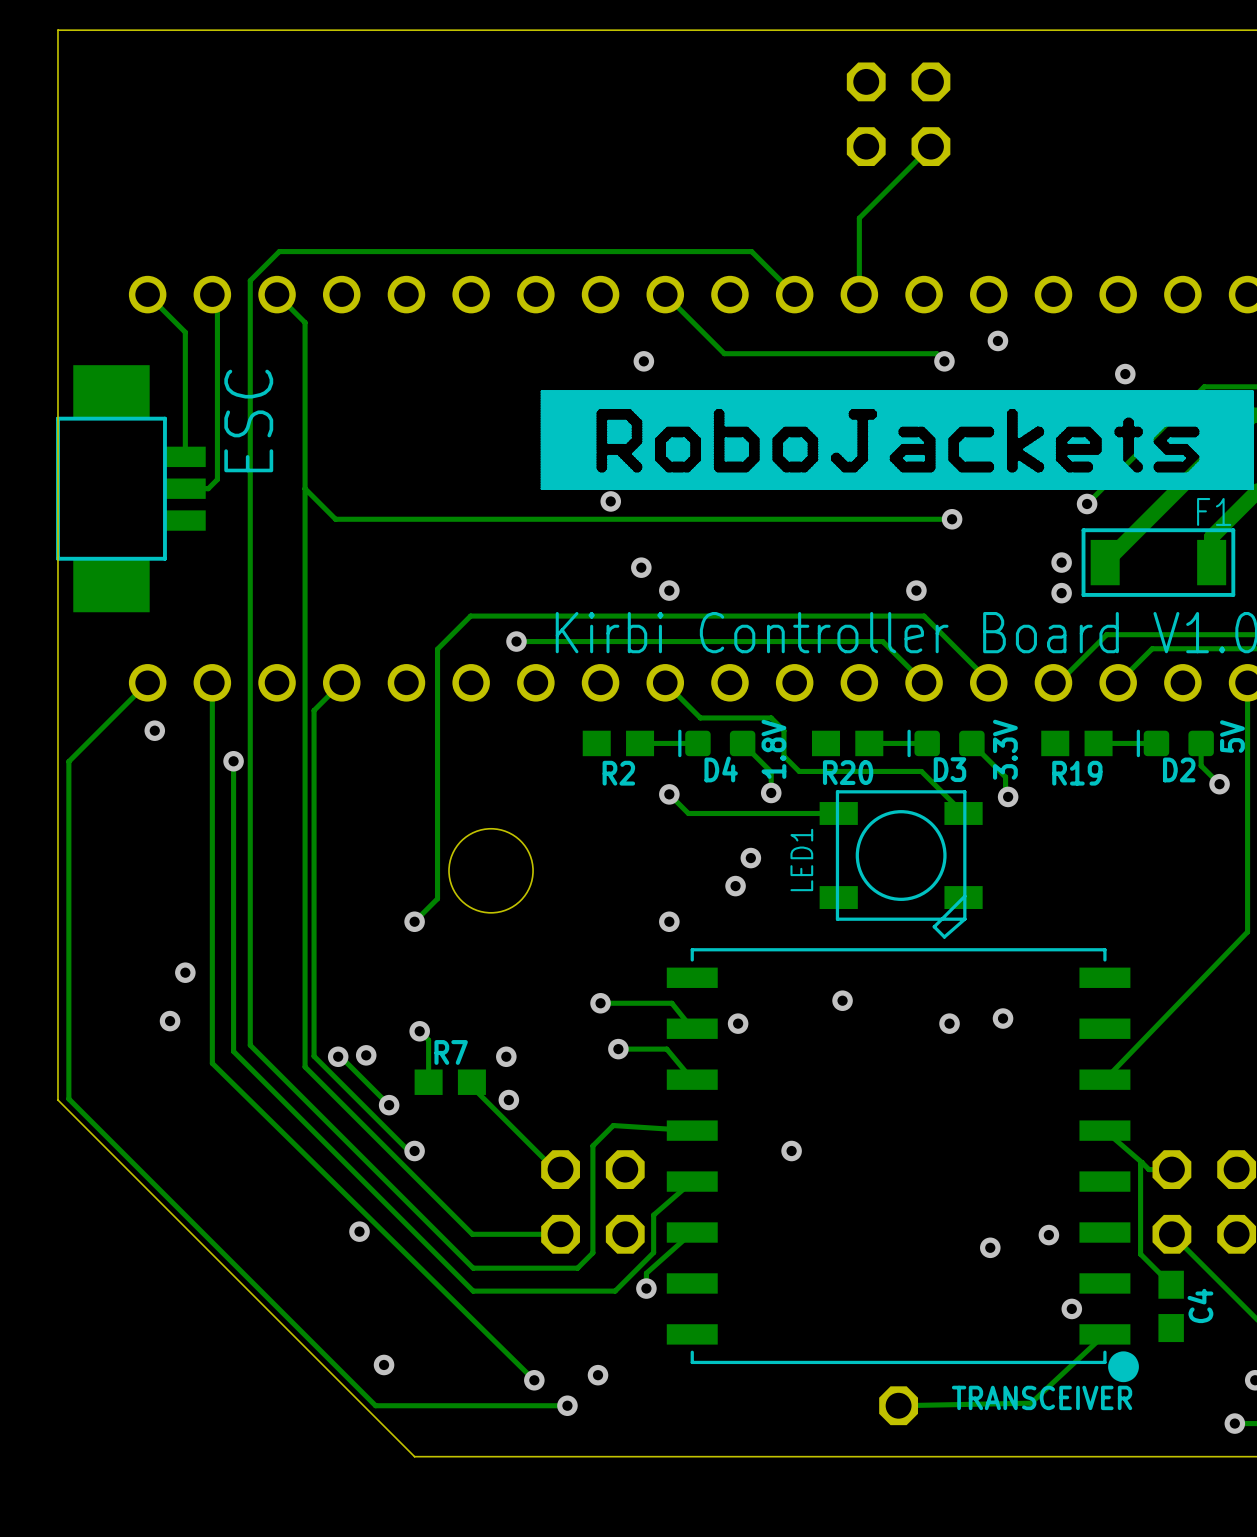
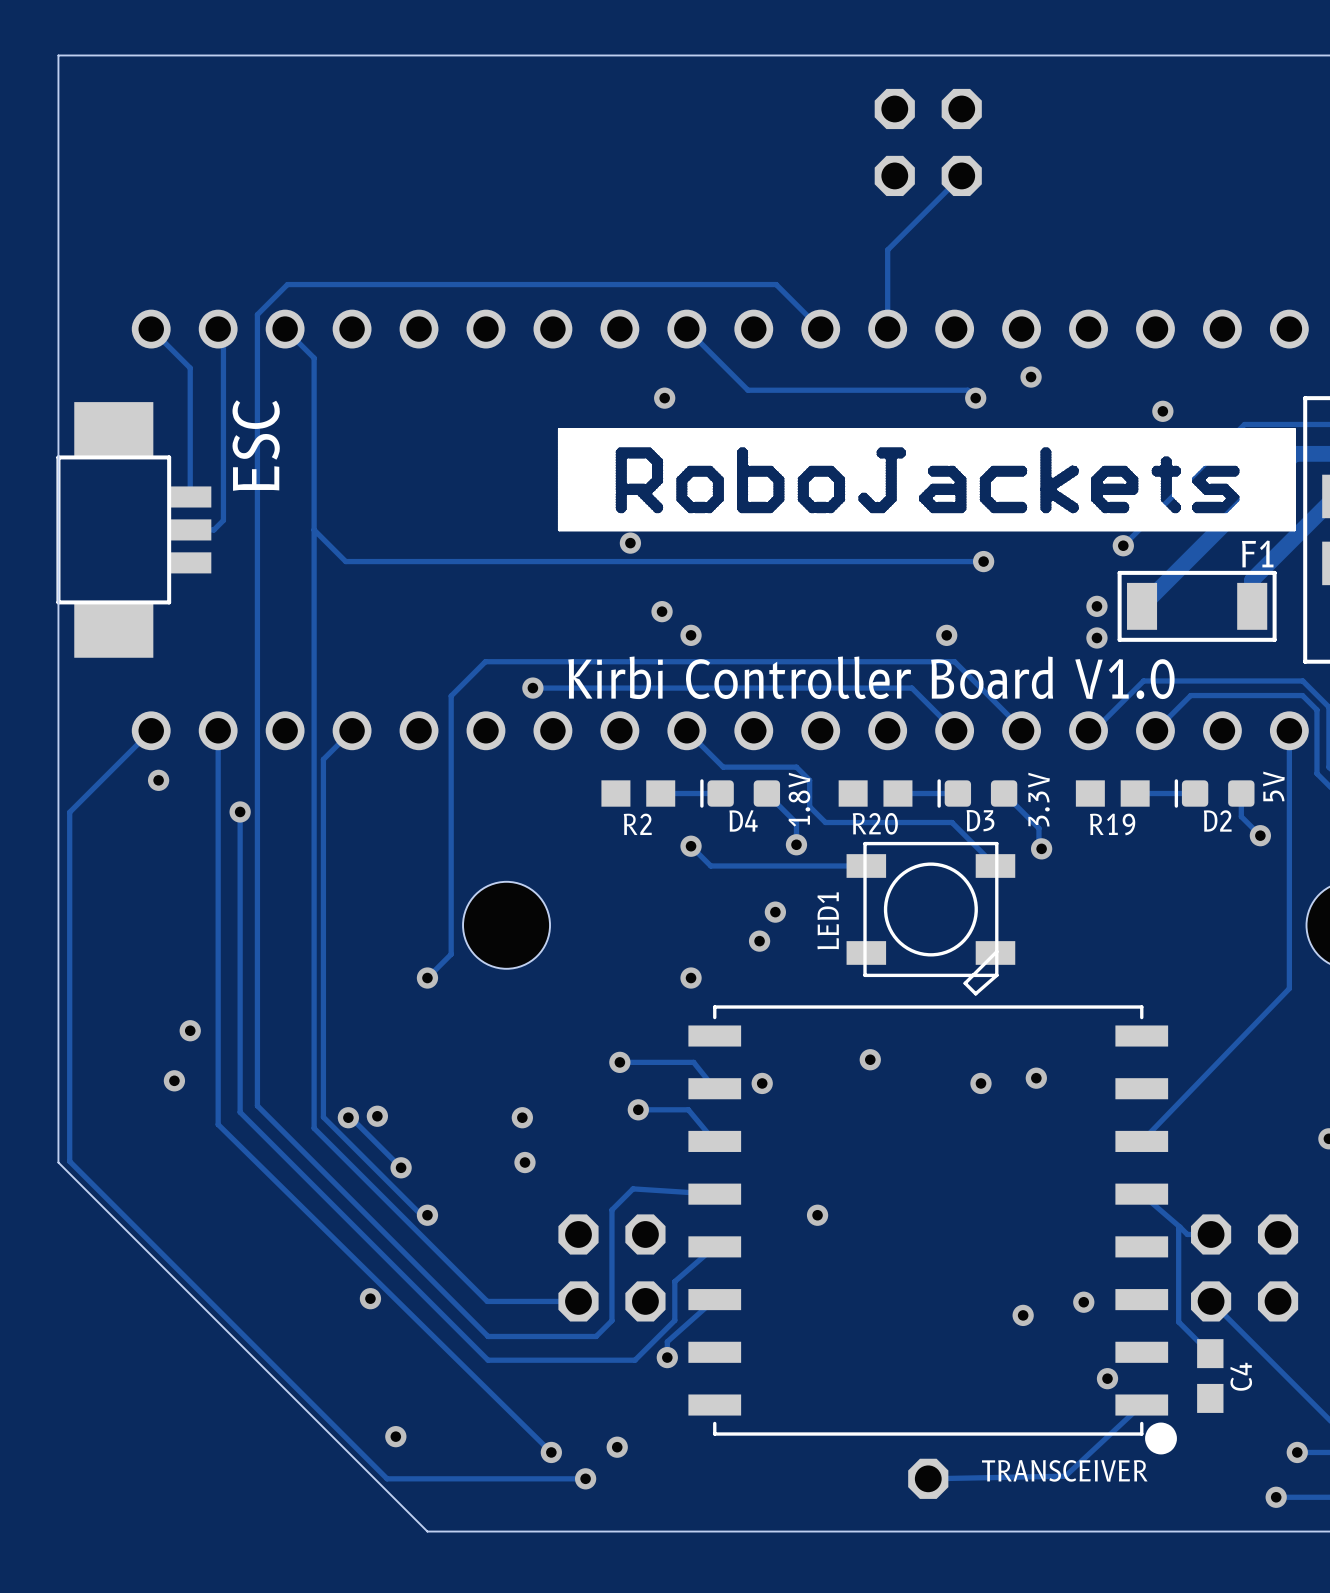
track: (419, 1031) (428, 1040) (428, 1082) -> none
via: (419, 1031) -> none
R7: (450, 1082) -> none
track: (471, 1082) (471, 1086) (554, 1169) (560, 1169) -> none

